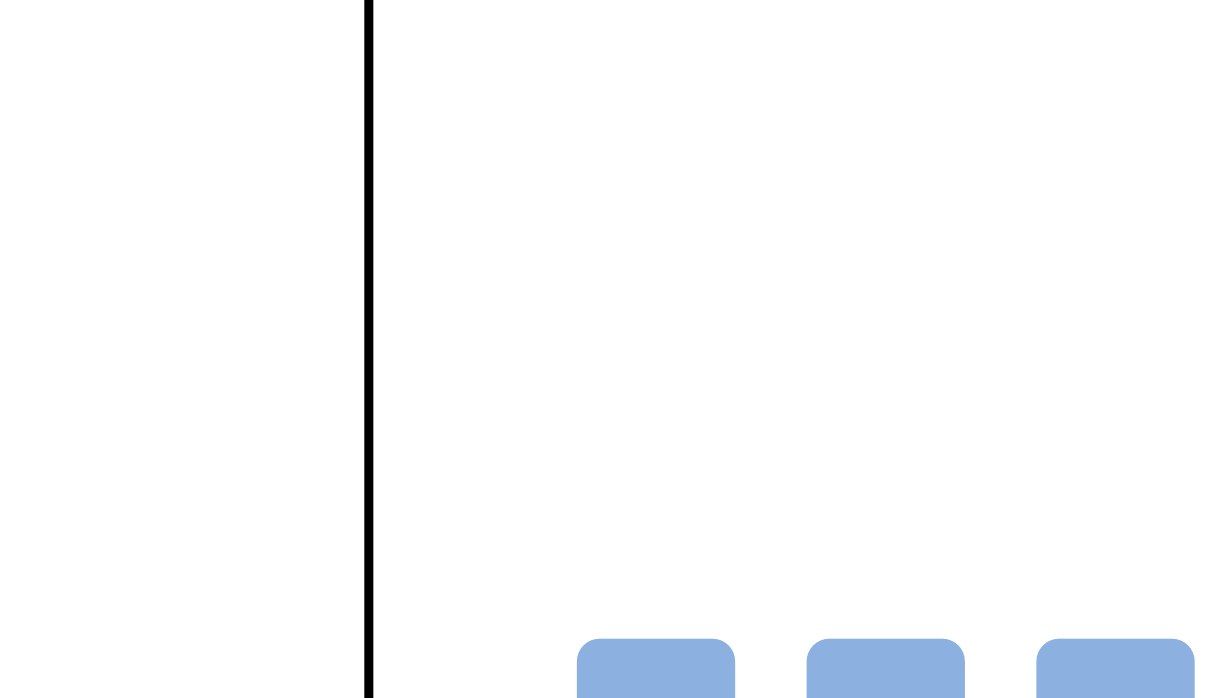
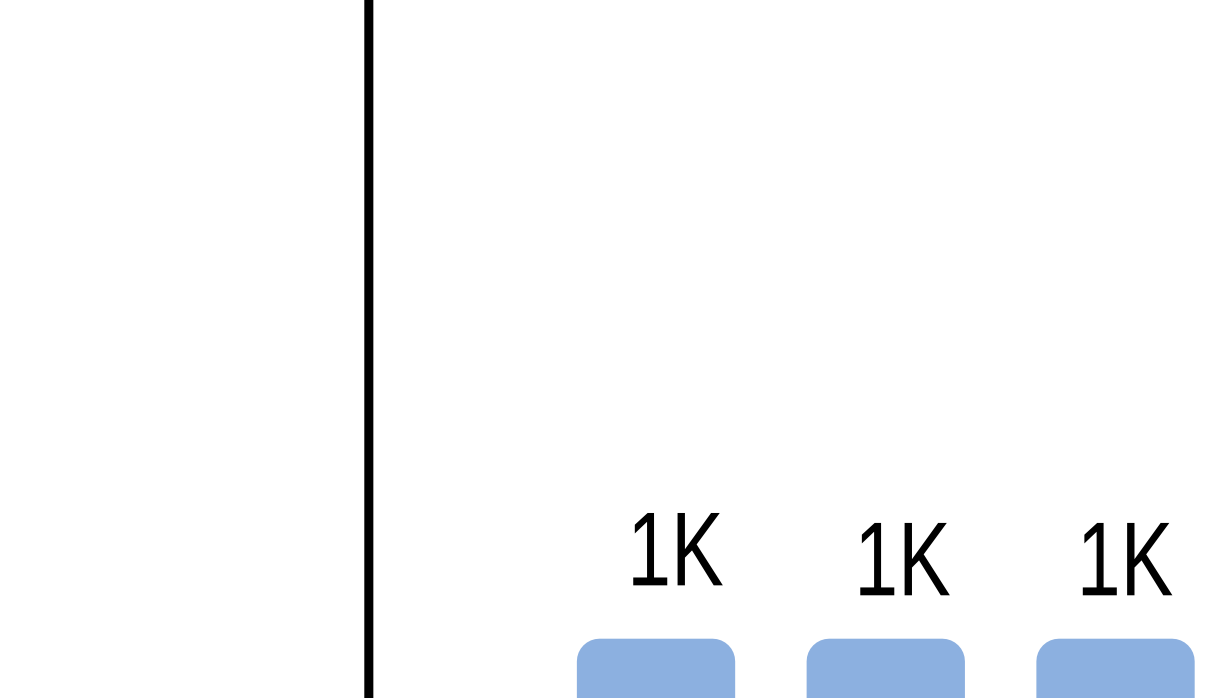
text: none -> 1K (678, 549)
text: none -> 1K (905, 559)
text: none -> 1K (1127, 559)

